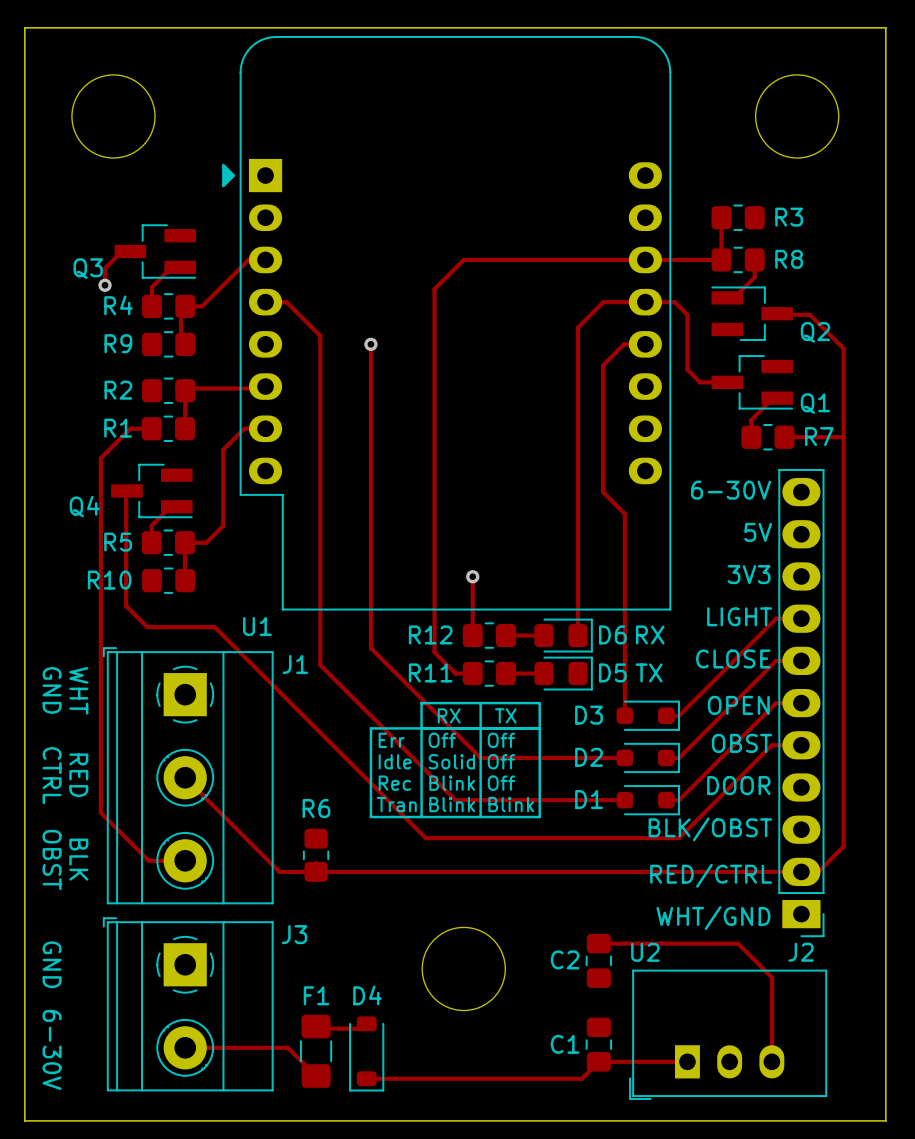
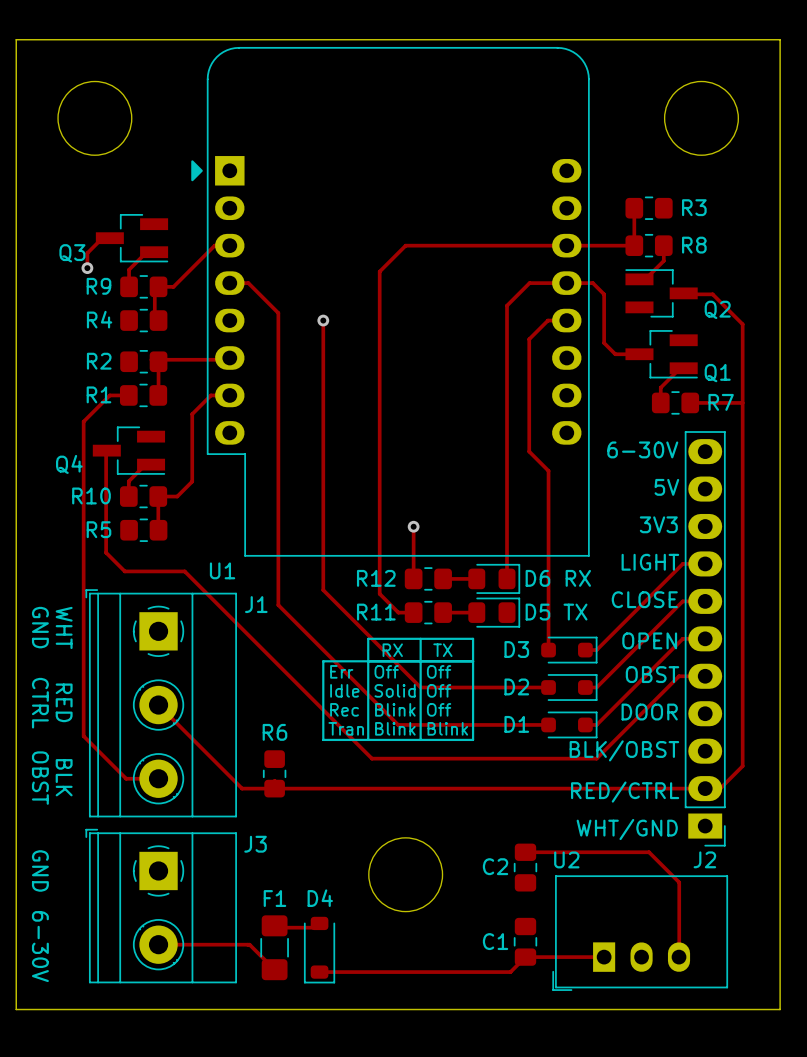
R4 name: R4 (118, 305) -> R9 (98, 286)
R9 name: R9 (118, 343) -> R4 (99, 319)
R5 name: R5 (118, 542) -> R10 (91, 495)
R10 name: R10 (109, 580) -> R5 (98, 529)
D6 name: D6 (612, 634) -> D6 RX (558, 578)
D6 value: RX (650, 634) -> none
D5 name: D5 (612, 672) -> D5 TX (556, 612)
D5 value: TX (649, 672) -> none

